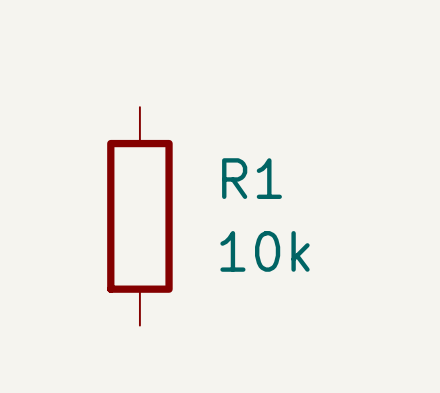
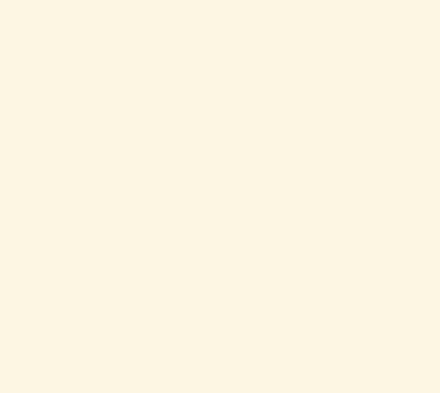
R1: 10k (139, 216) -> none

